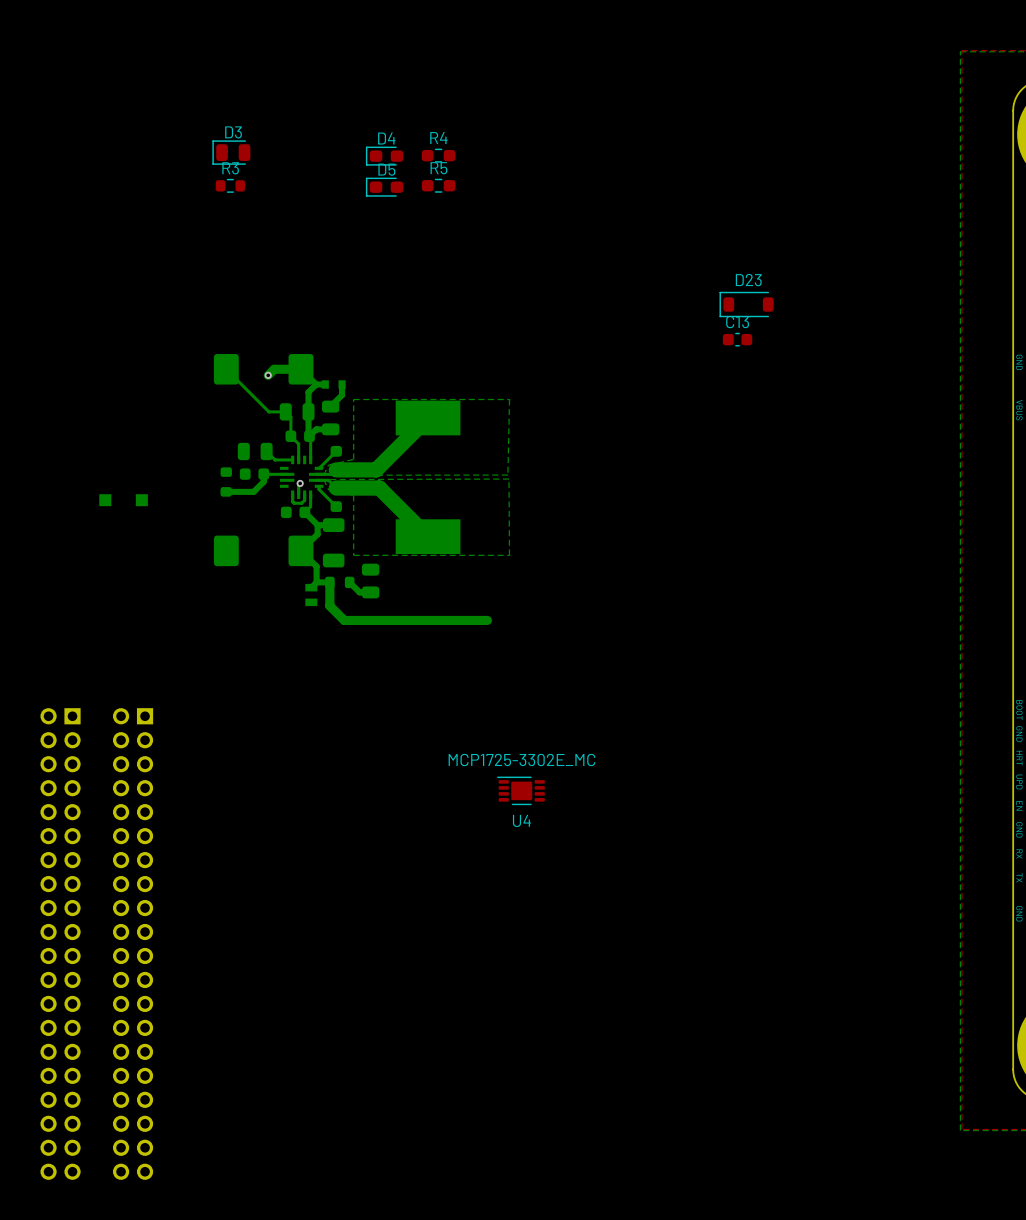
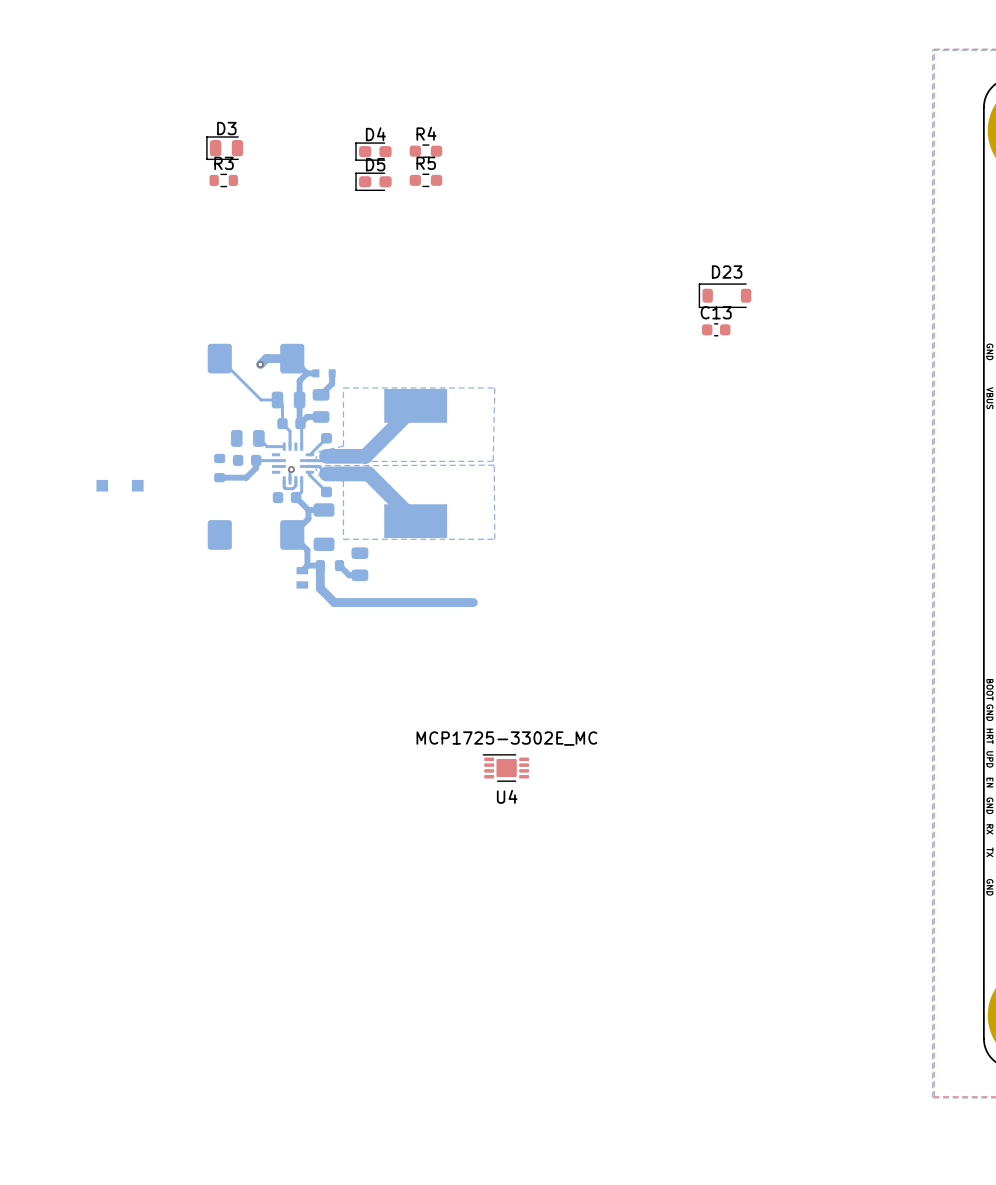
part: (60, 944) -> none
part: (133, 944) -> none

